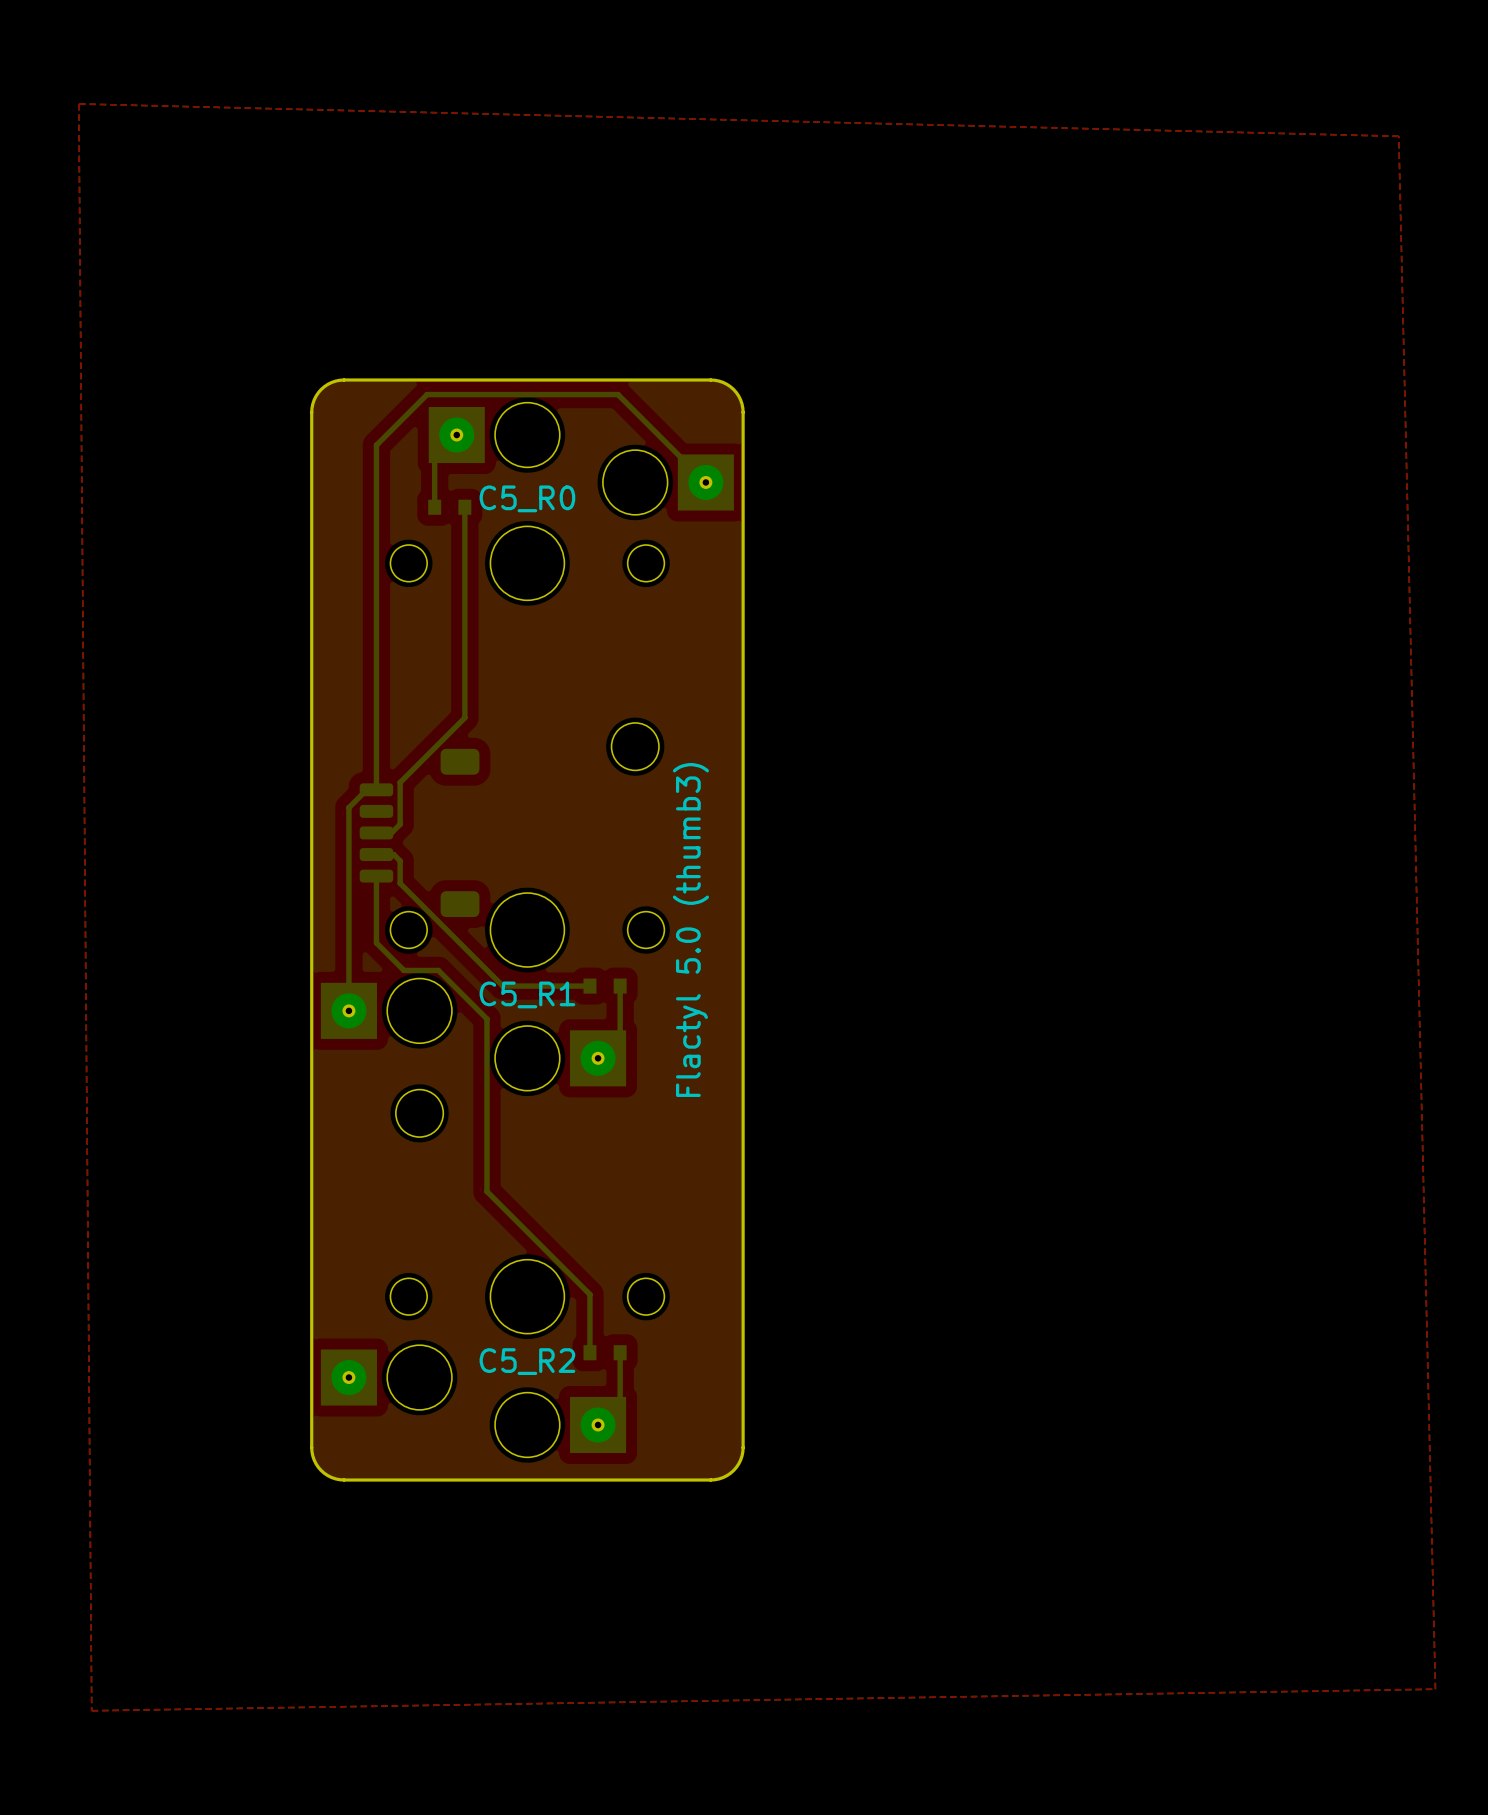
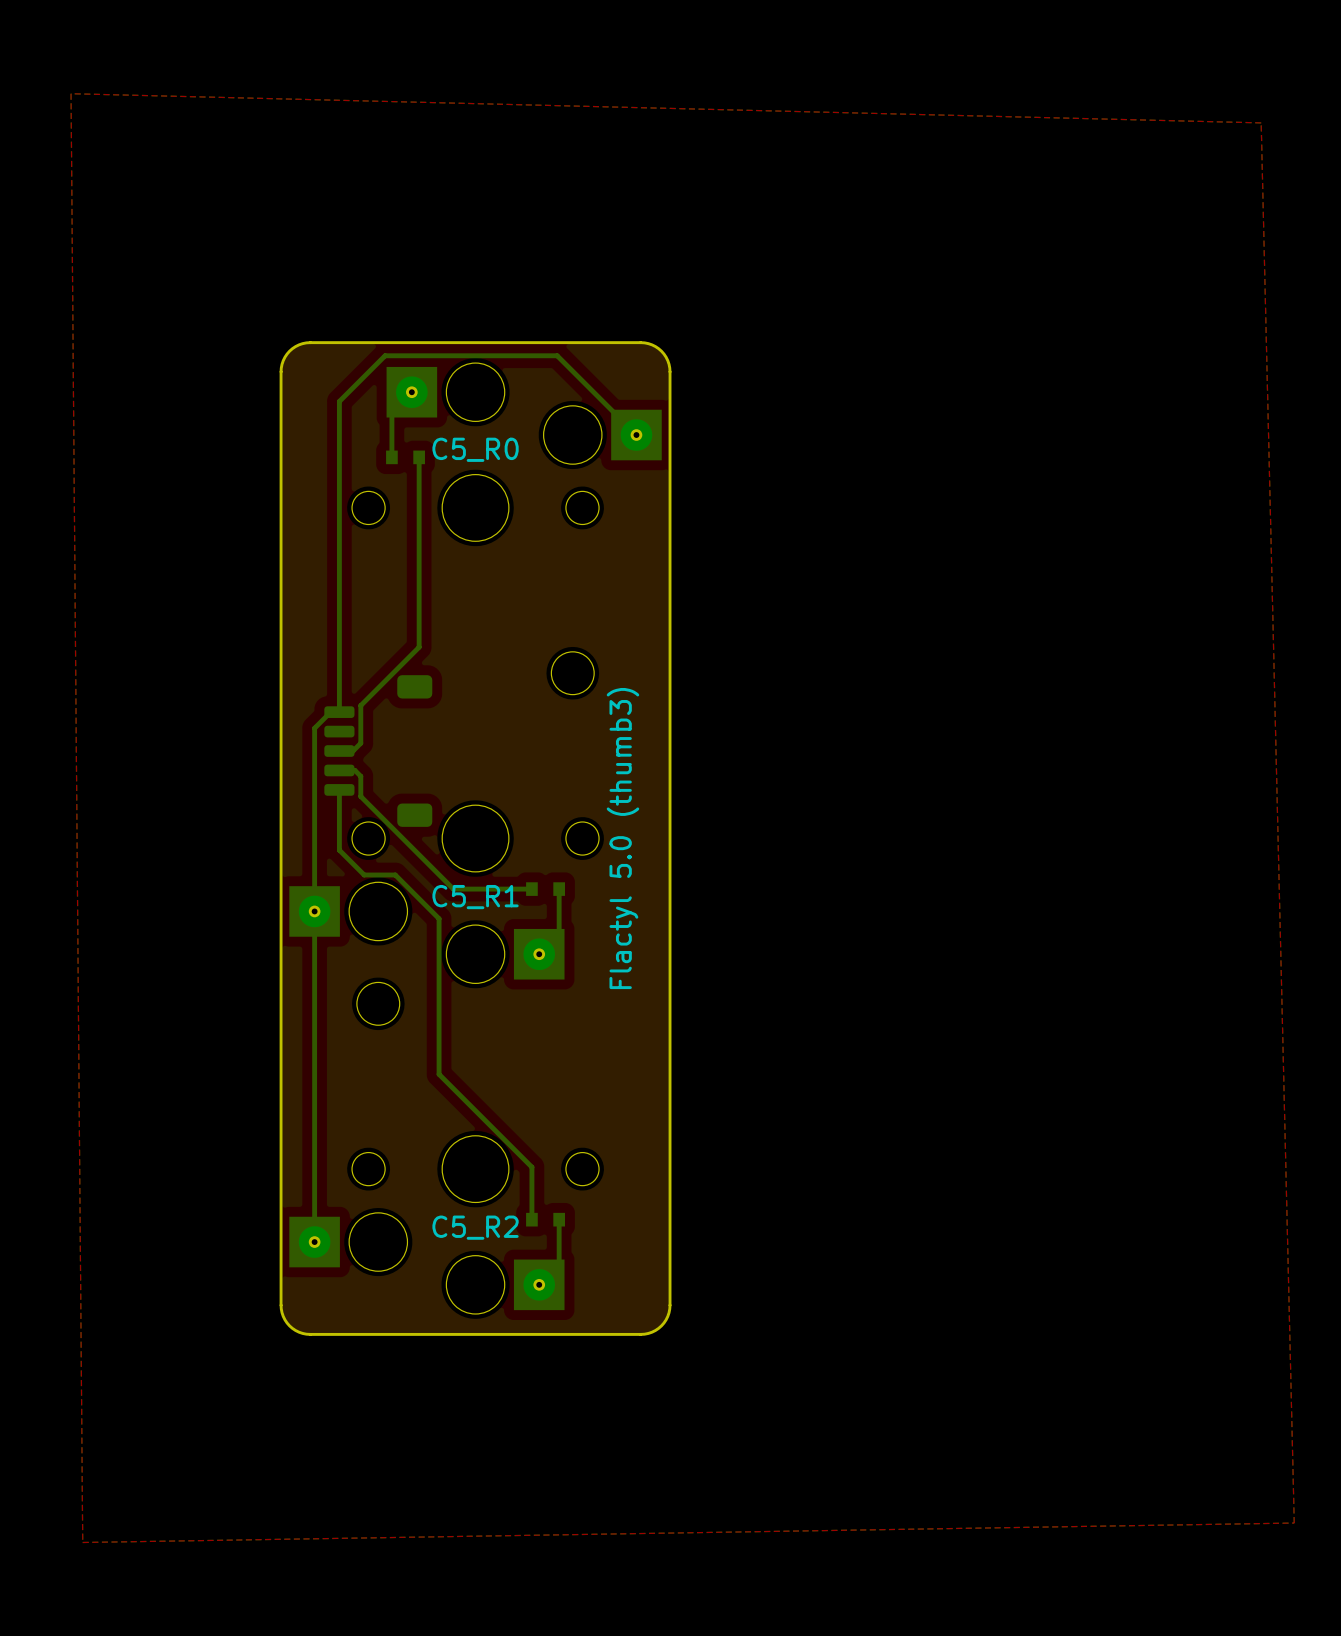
bottom track: none -> (314, 911) (314, 1242)

